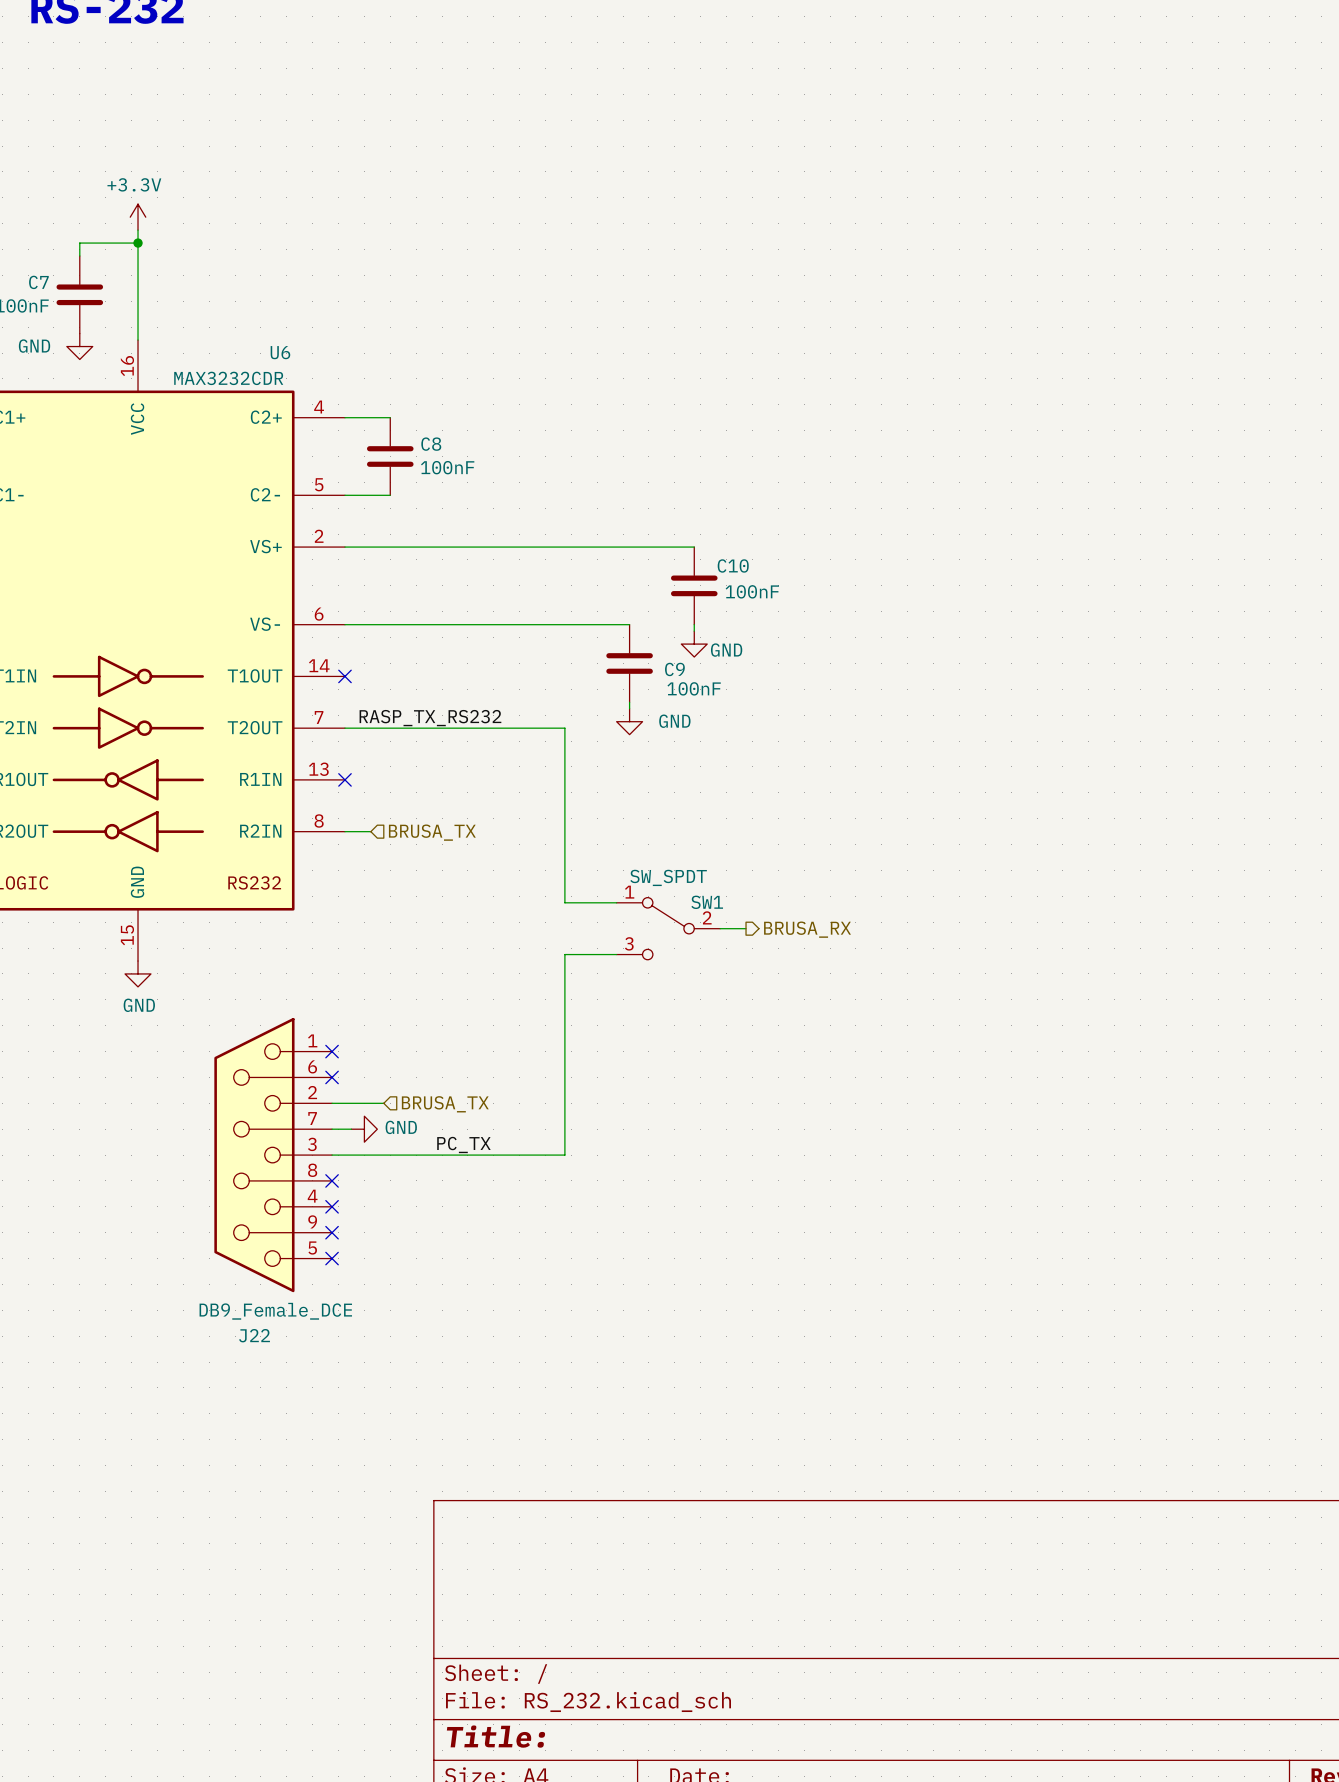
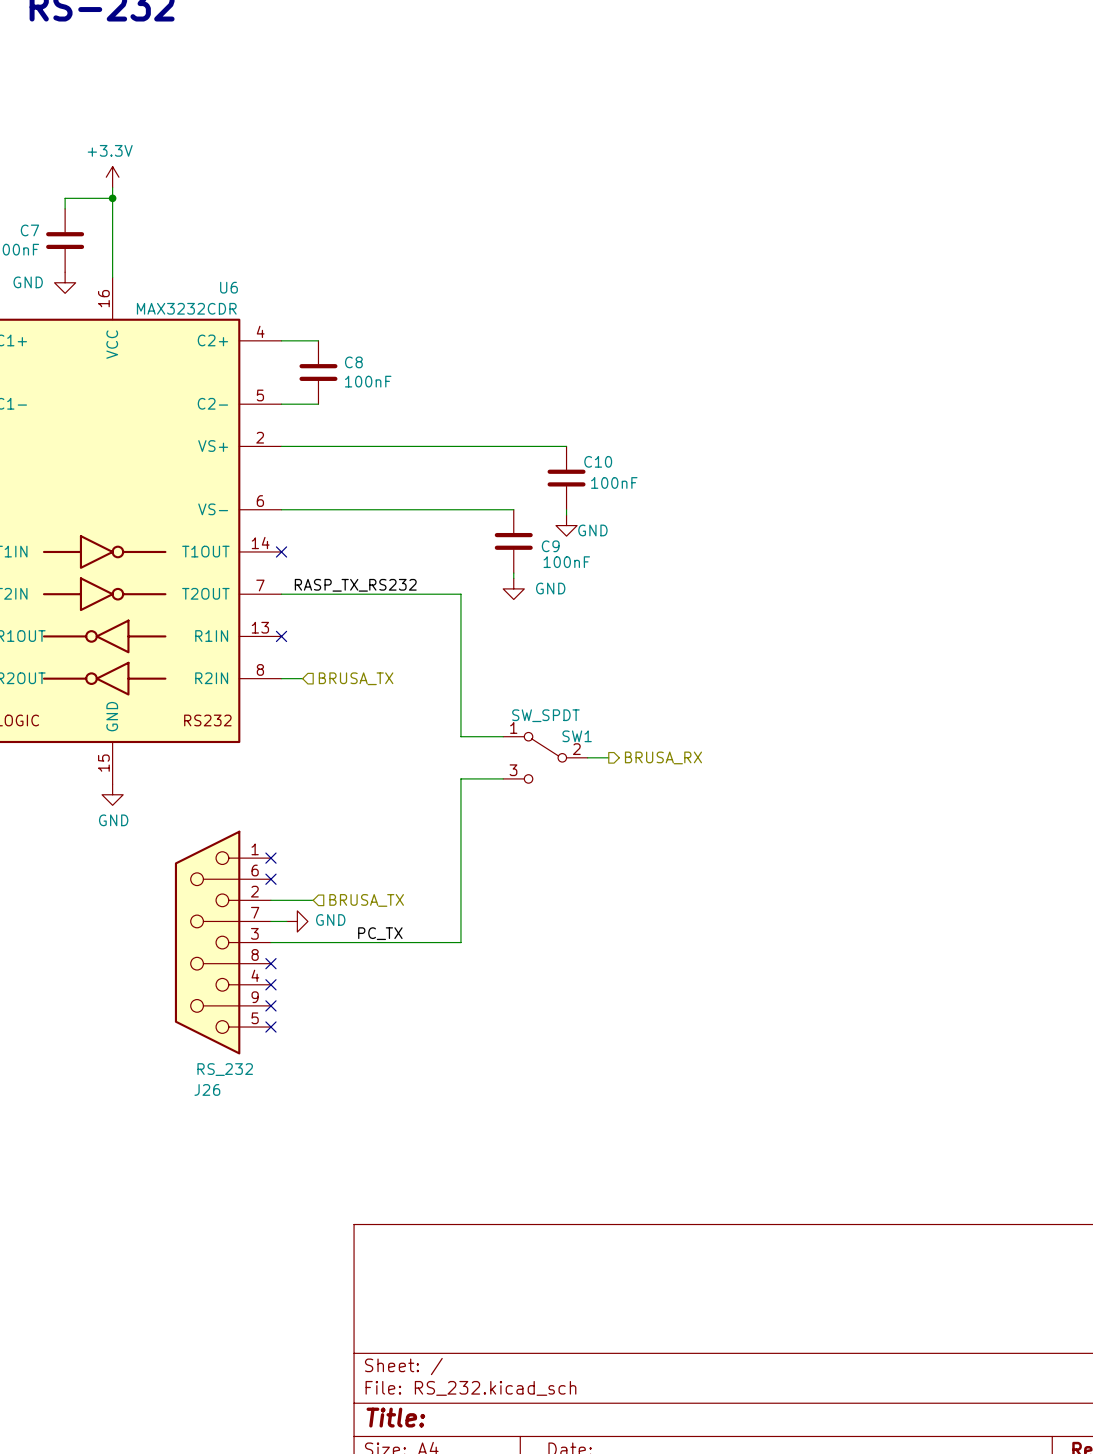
J22 value: DB9_Female_DCE (275, 1311) -> RS_232 (225, 1069)
J22 name: J22 (254, 1335) -> J26 (207, 1089)

